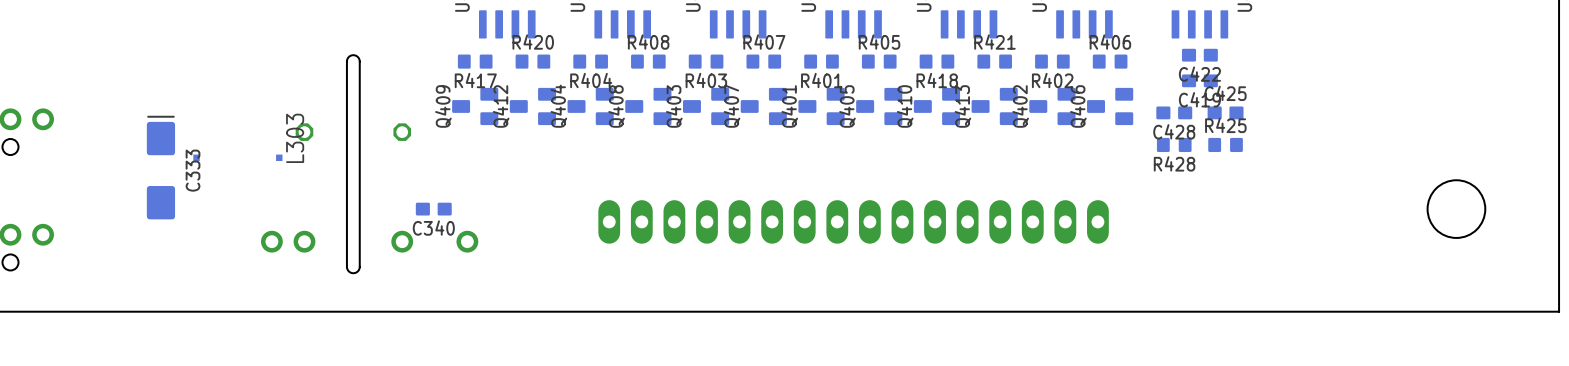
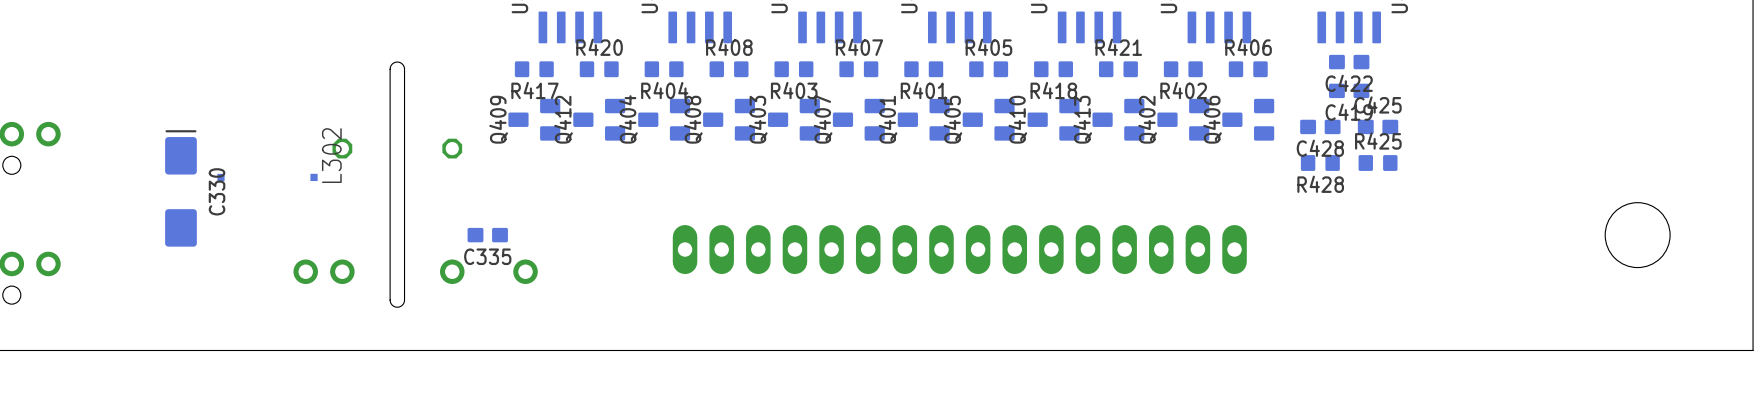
L303 name: L303 (295, 138) -> L302 (331, 155)
C333 name: C333 (193, 170) -> C330 (217, 191)
C340 name: C340 (433, 228) -> C335 (487, 256)

